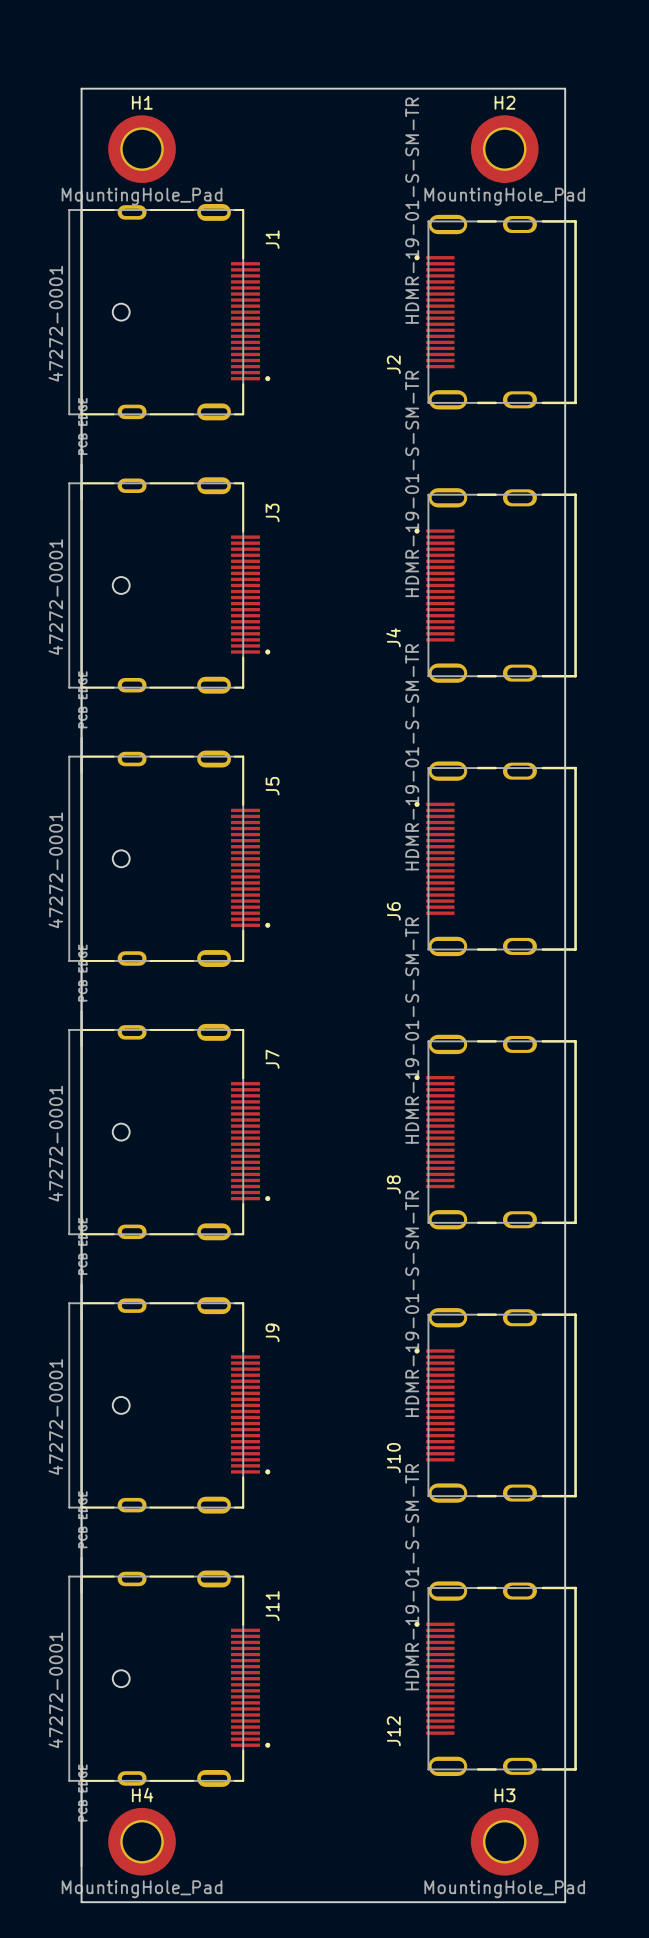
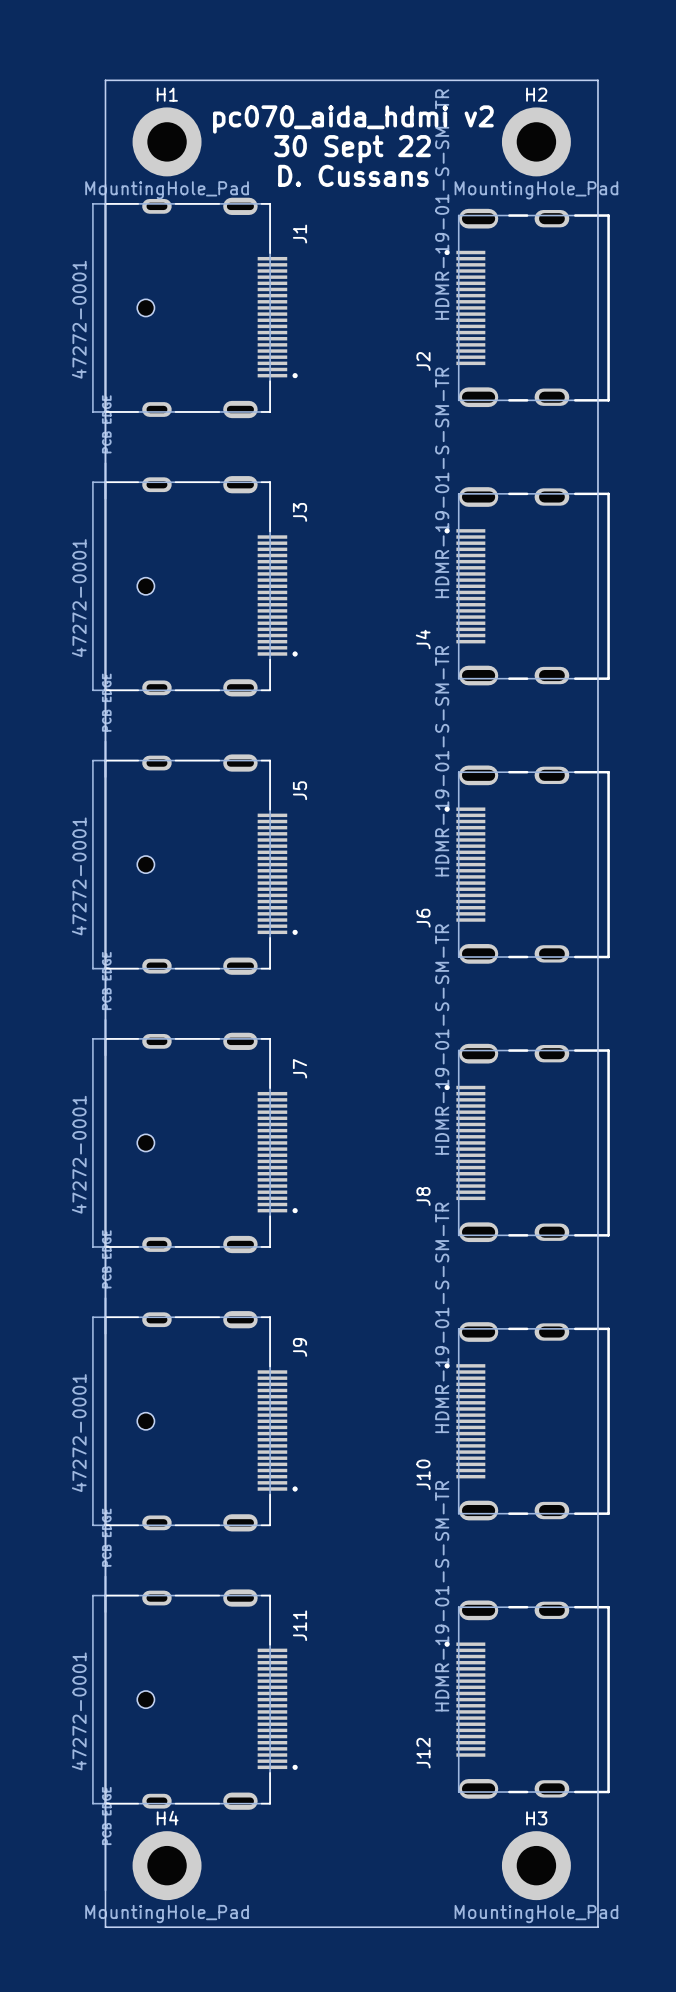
text: none -> pc070_aida_hdmi v2 (353, 119)
text: none -> 30 Sept 22 (352, 149)
text: none -> D. Cussans (353, 175)

